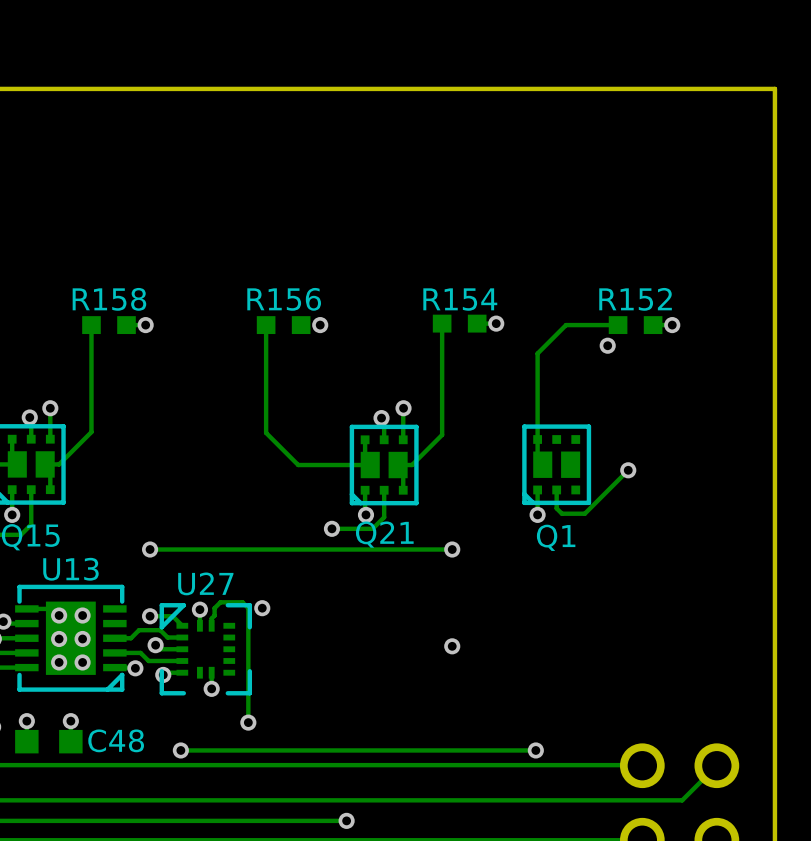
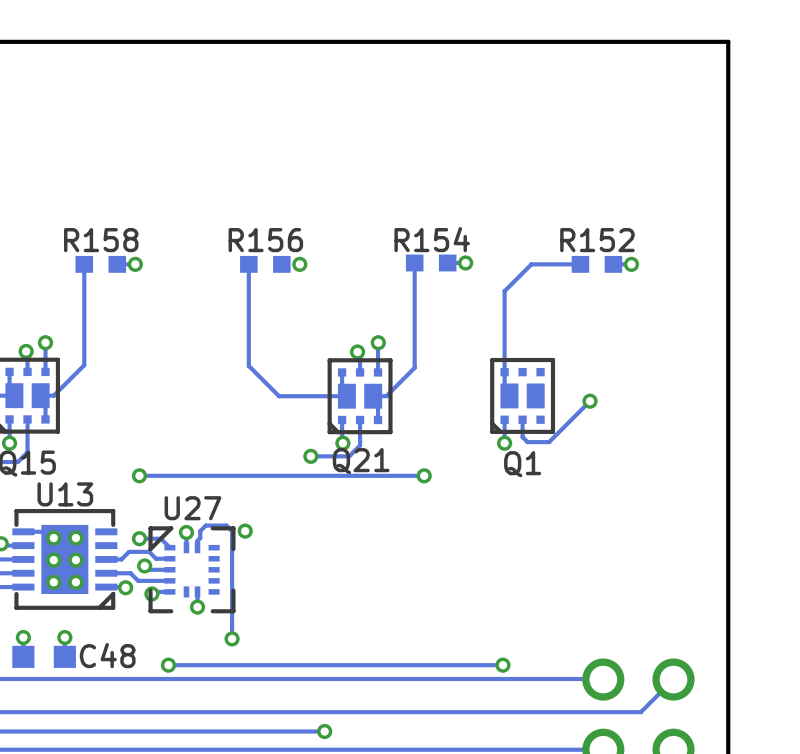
via: (607, 345) -> none
via: (452, 646) -> none

